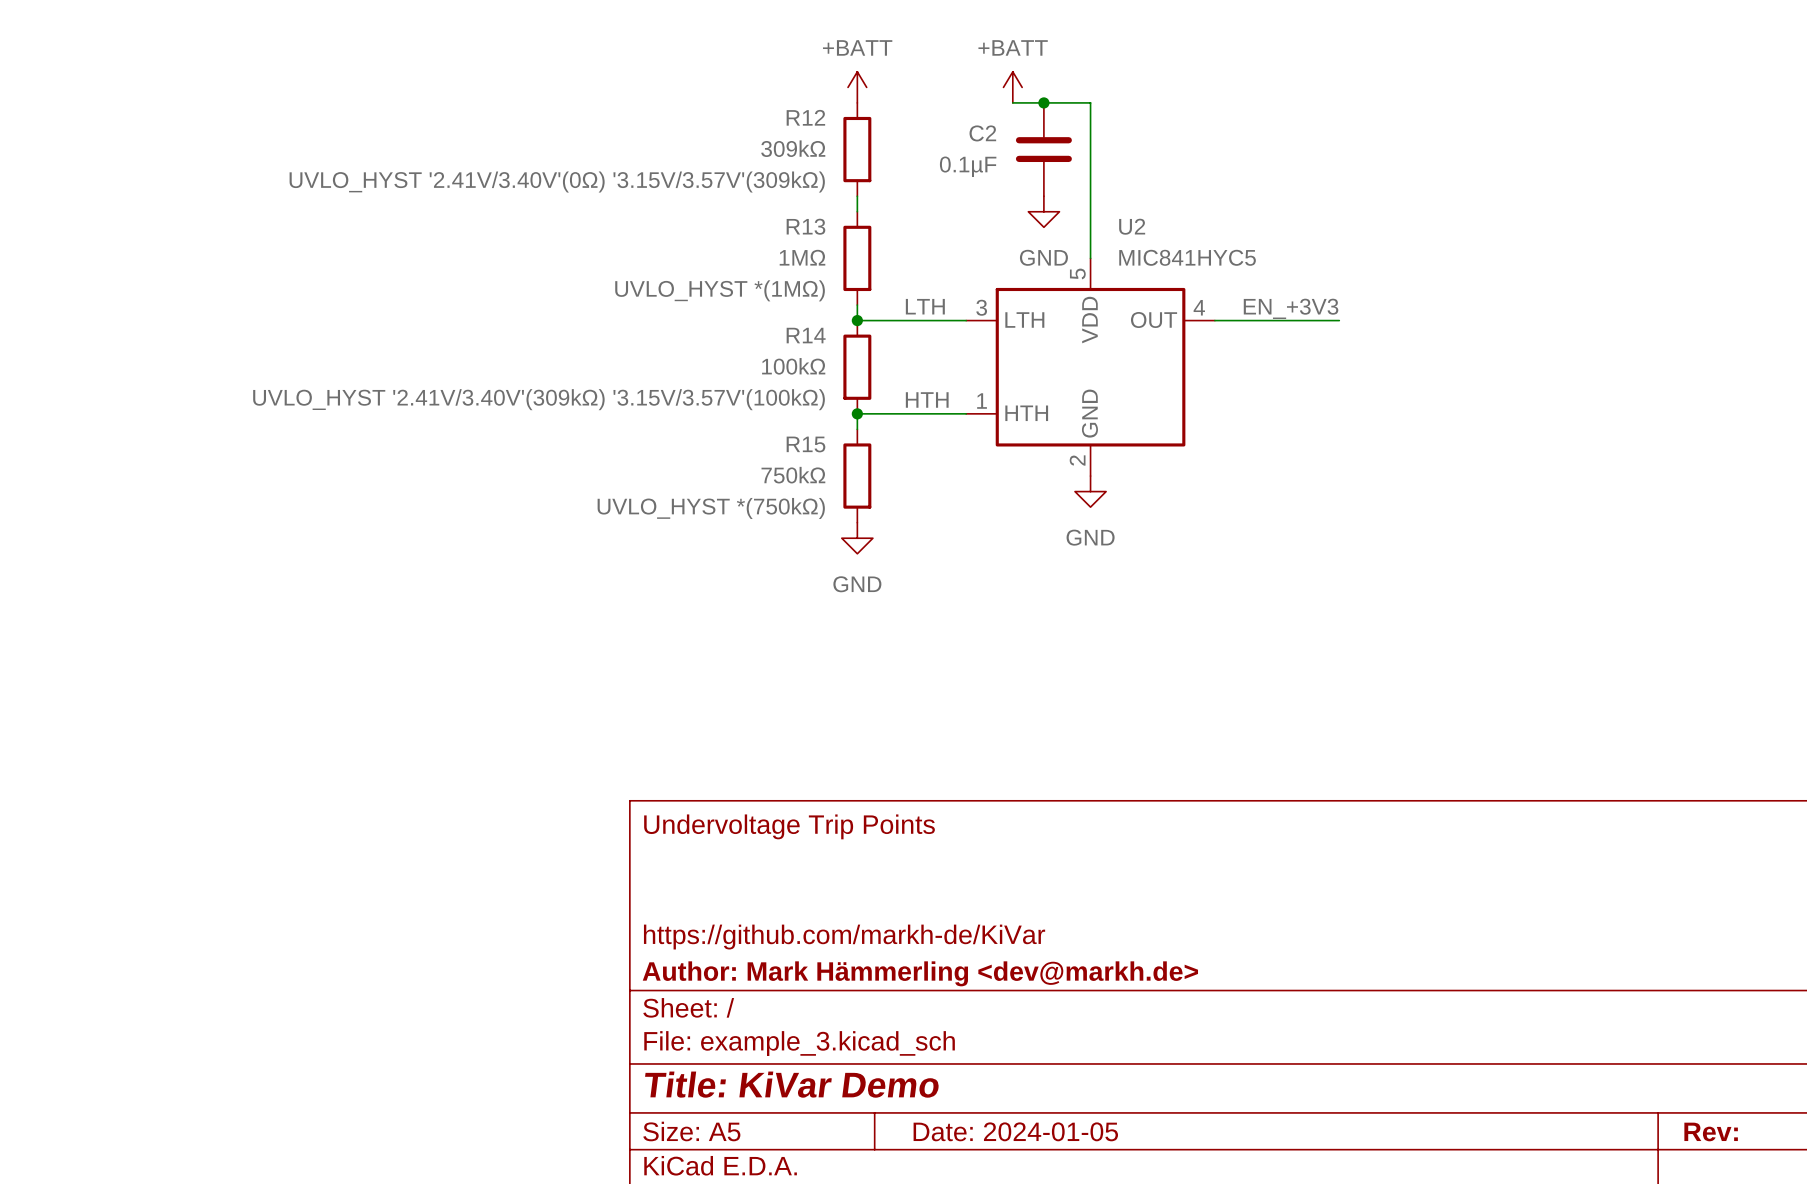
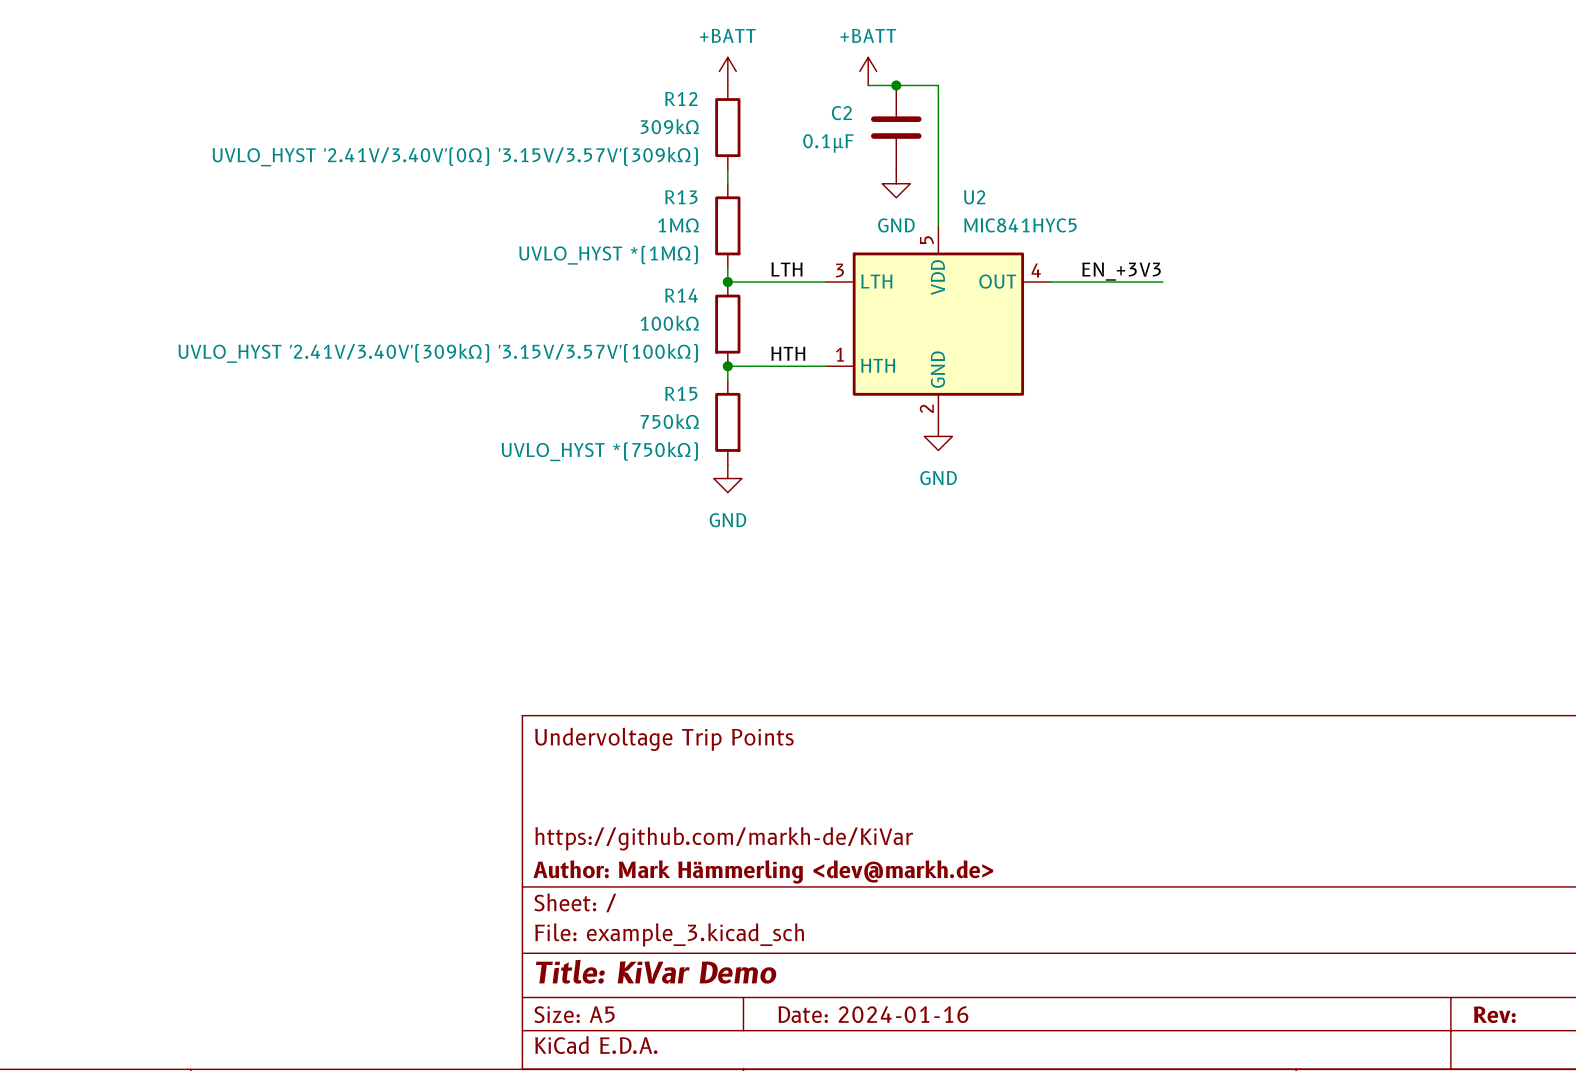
title block: Date: 2024-01-05 (1015, 1131) -> Date: 2024-01-16 (873, 1014)

